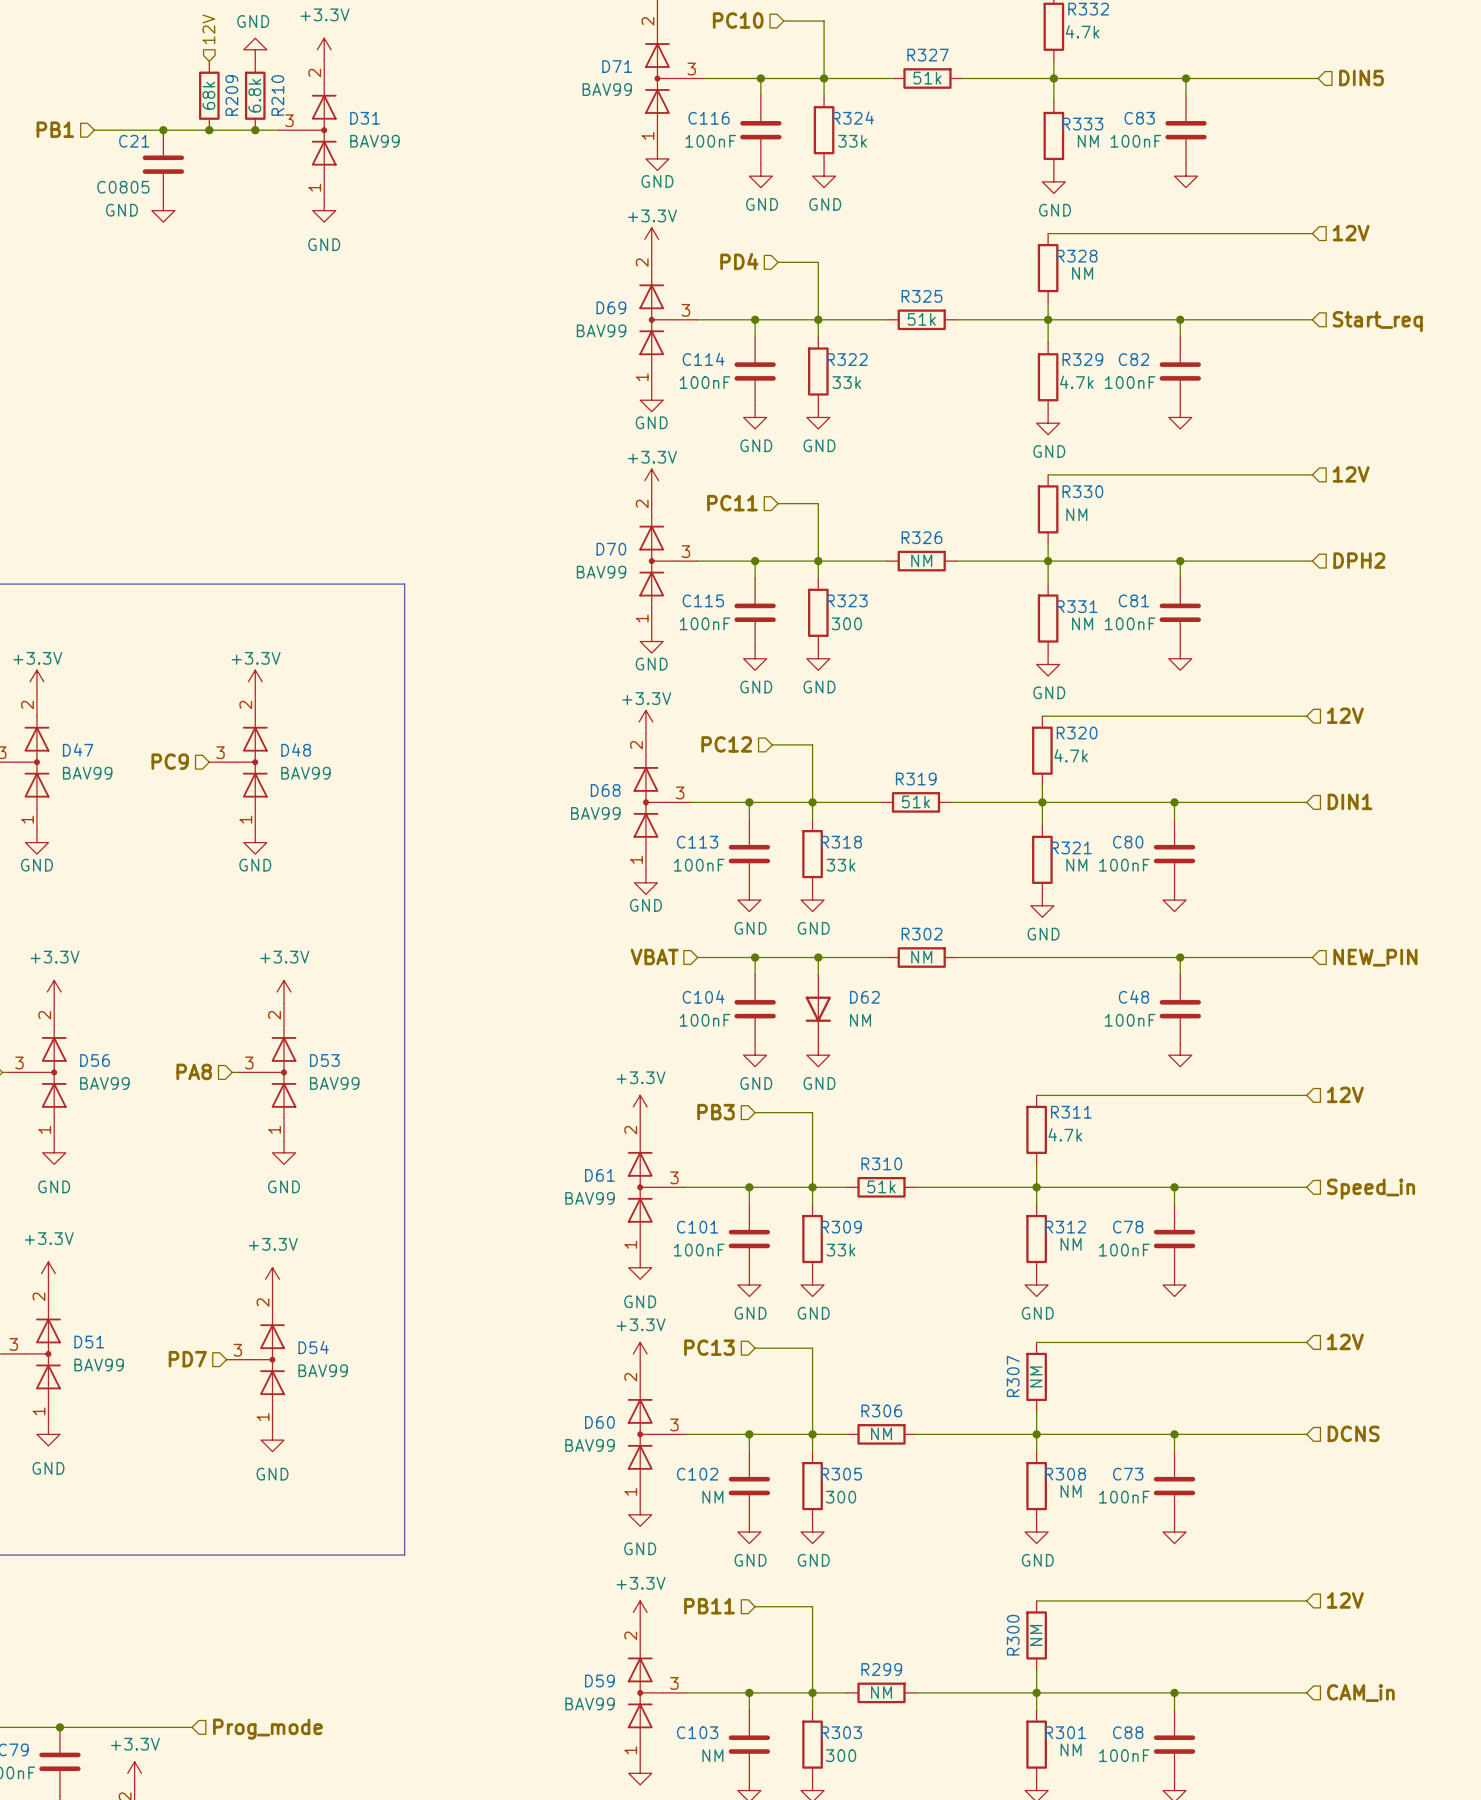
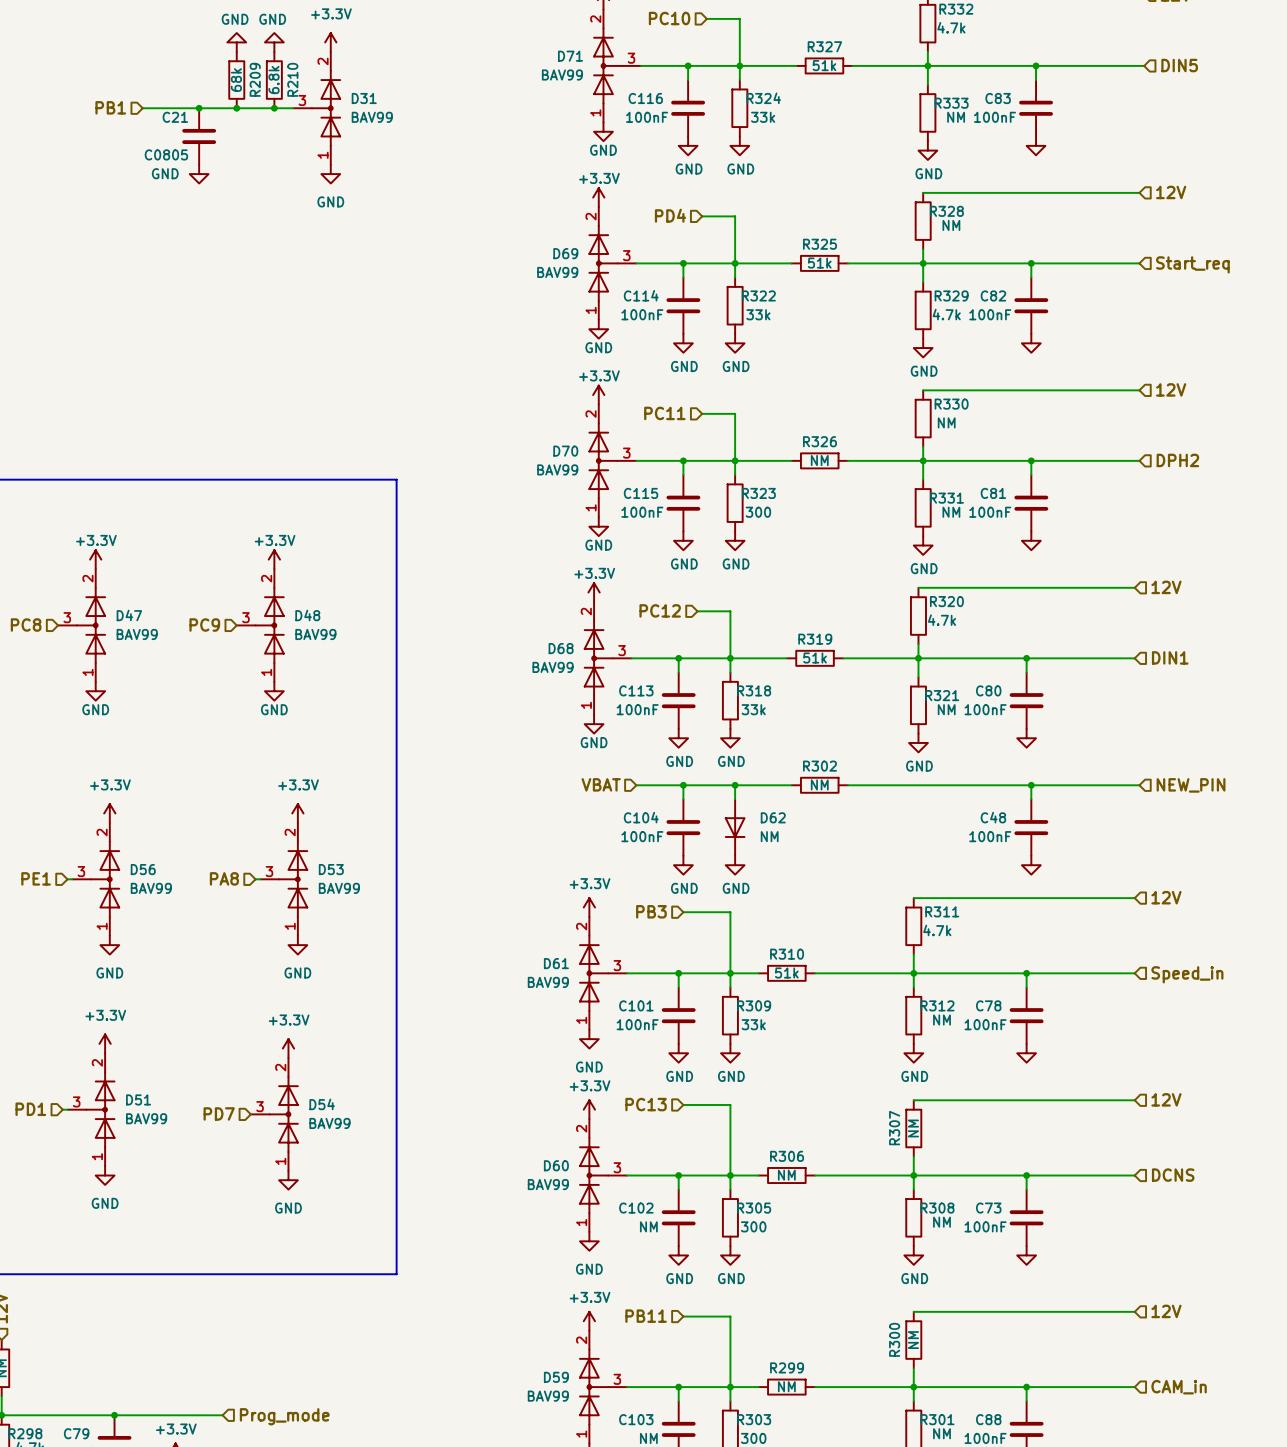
hierarchical label: 12V (208, 29) -> none
power symbol: none -> GND (236, 42)

